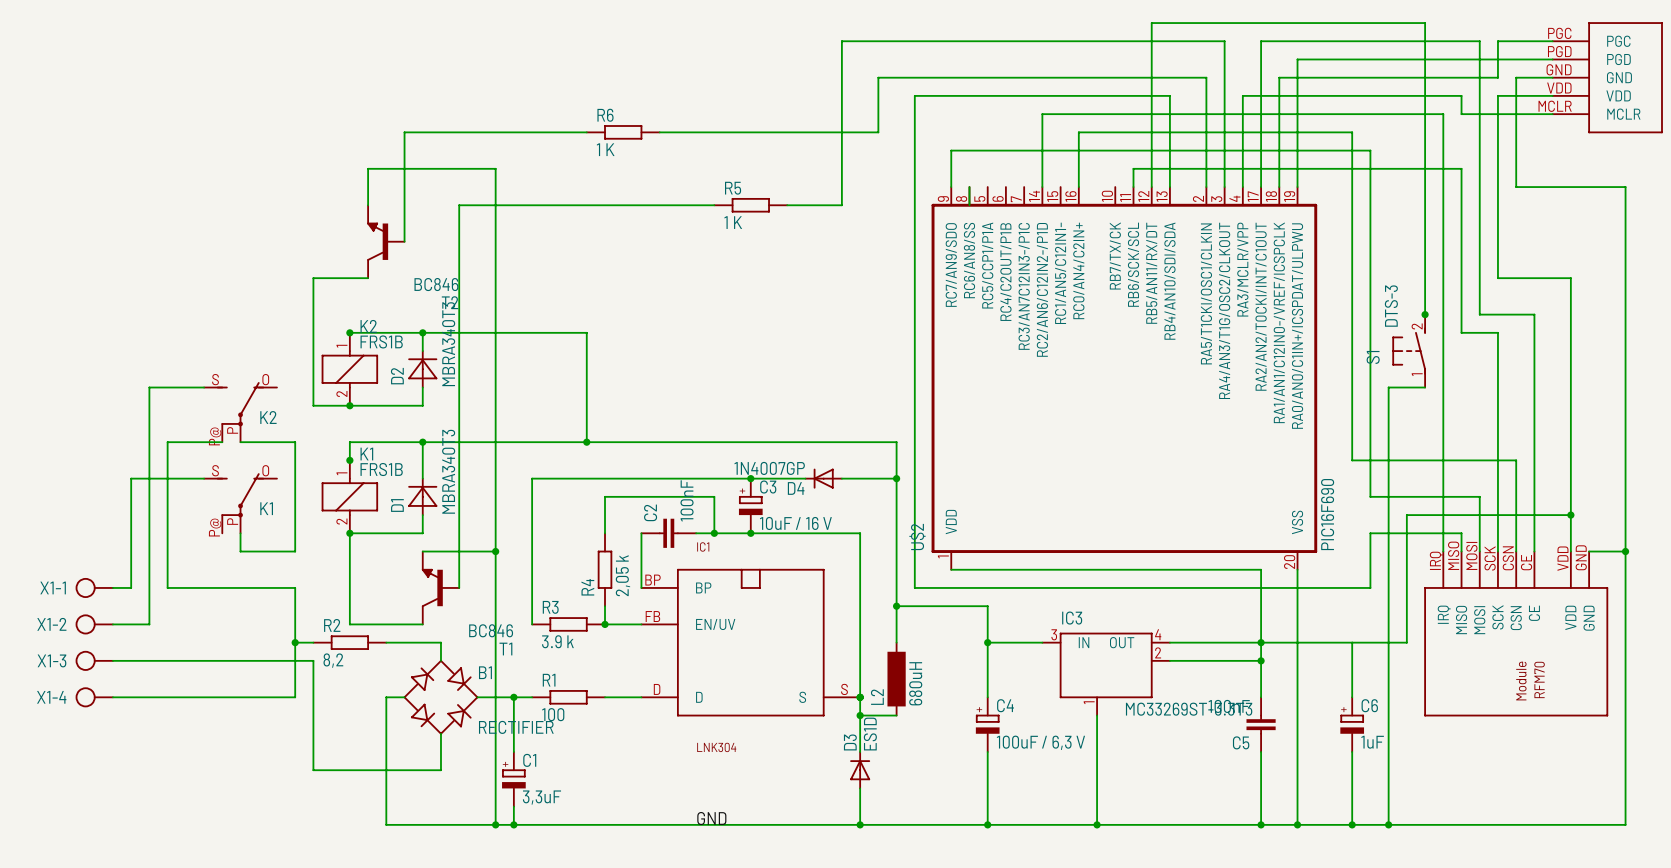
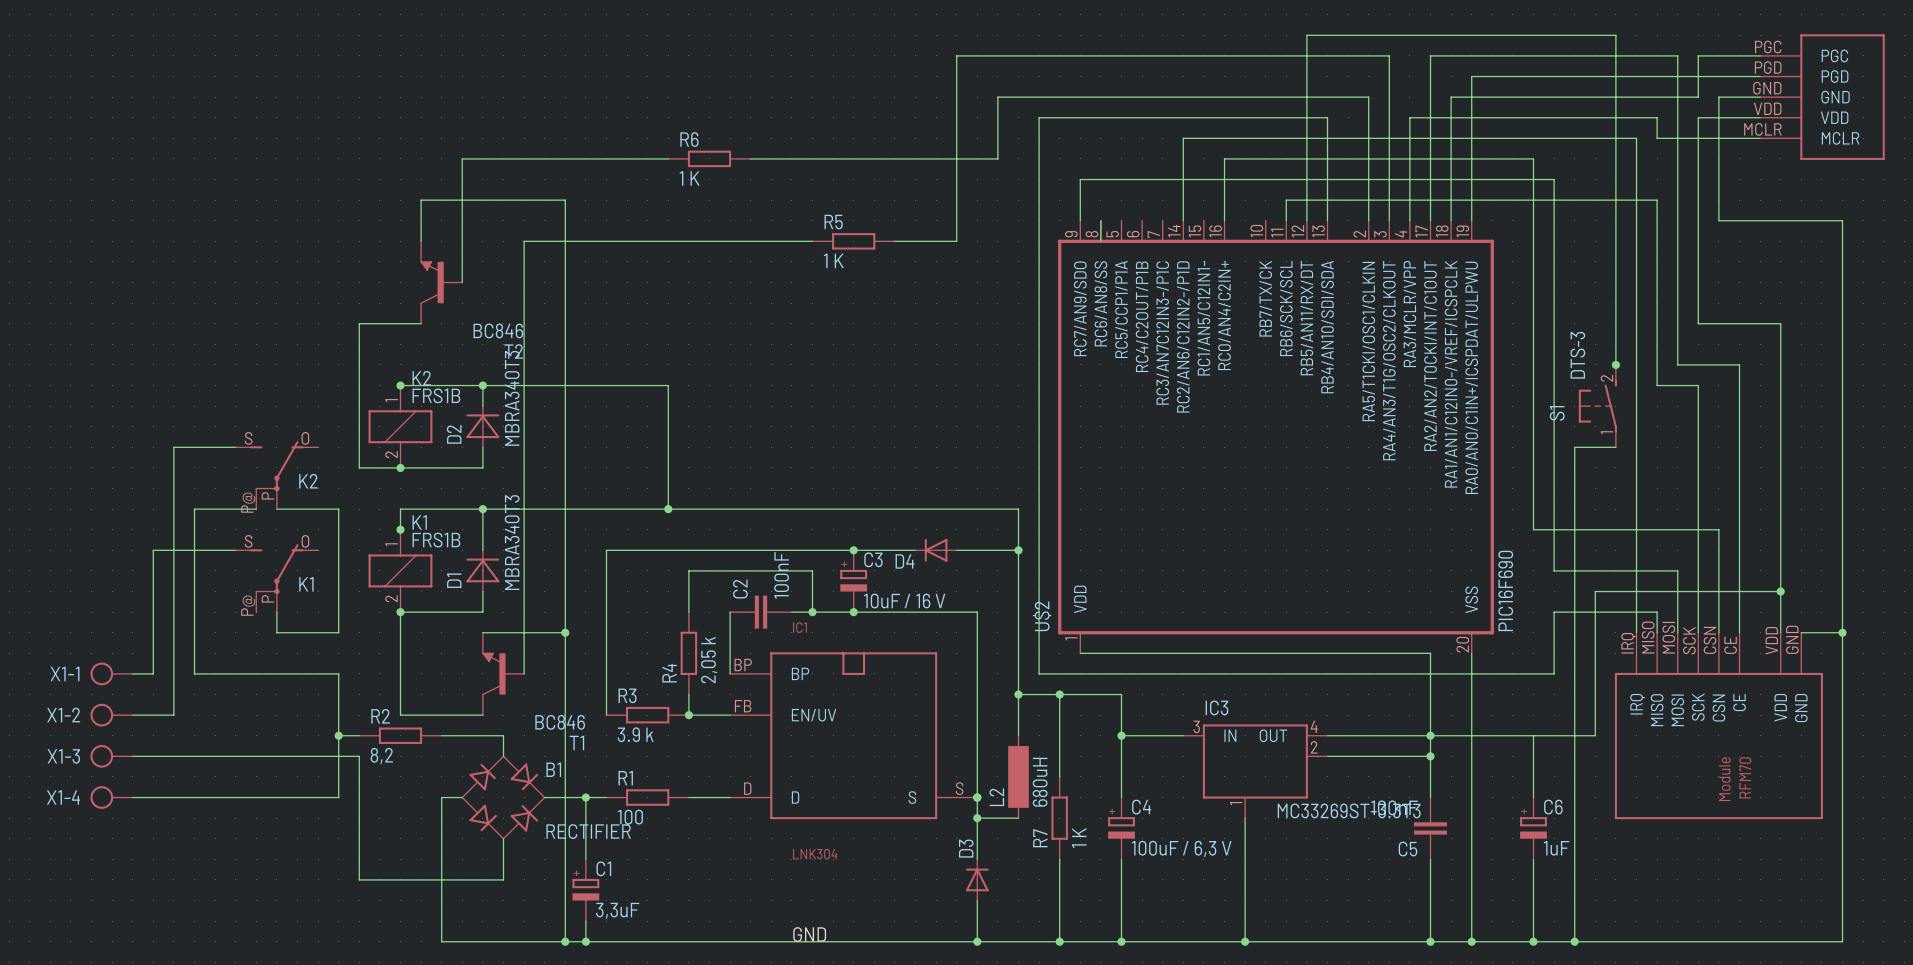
D4 value: 1N4007GP (769, 468) -> none
wire: none -> (1059, 694) (1059, 776)
junction: none -> (1059, 694)
R7: none -> 1 K (1059, 818)
D3 value: ES1D (870, 734) -> none
wire: none -> (1059, 859) (1059, 941)
junction: none -> (1059, 941)

